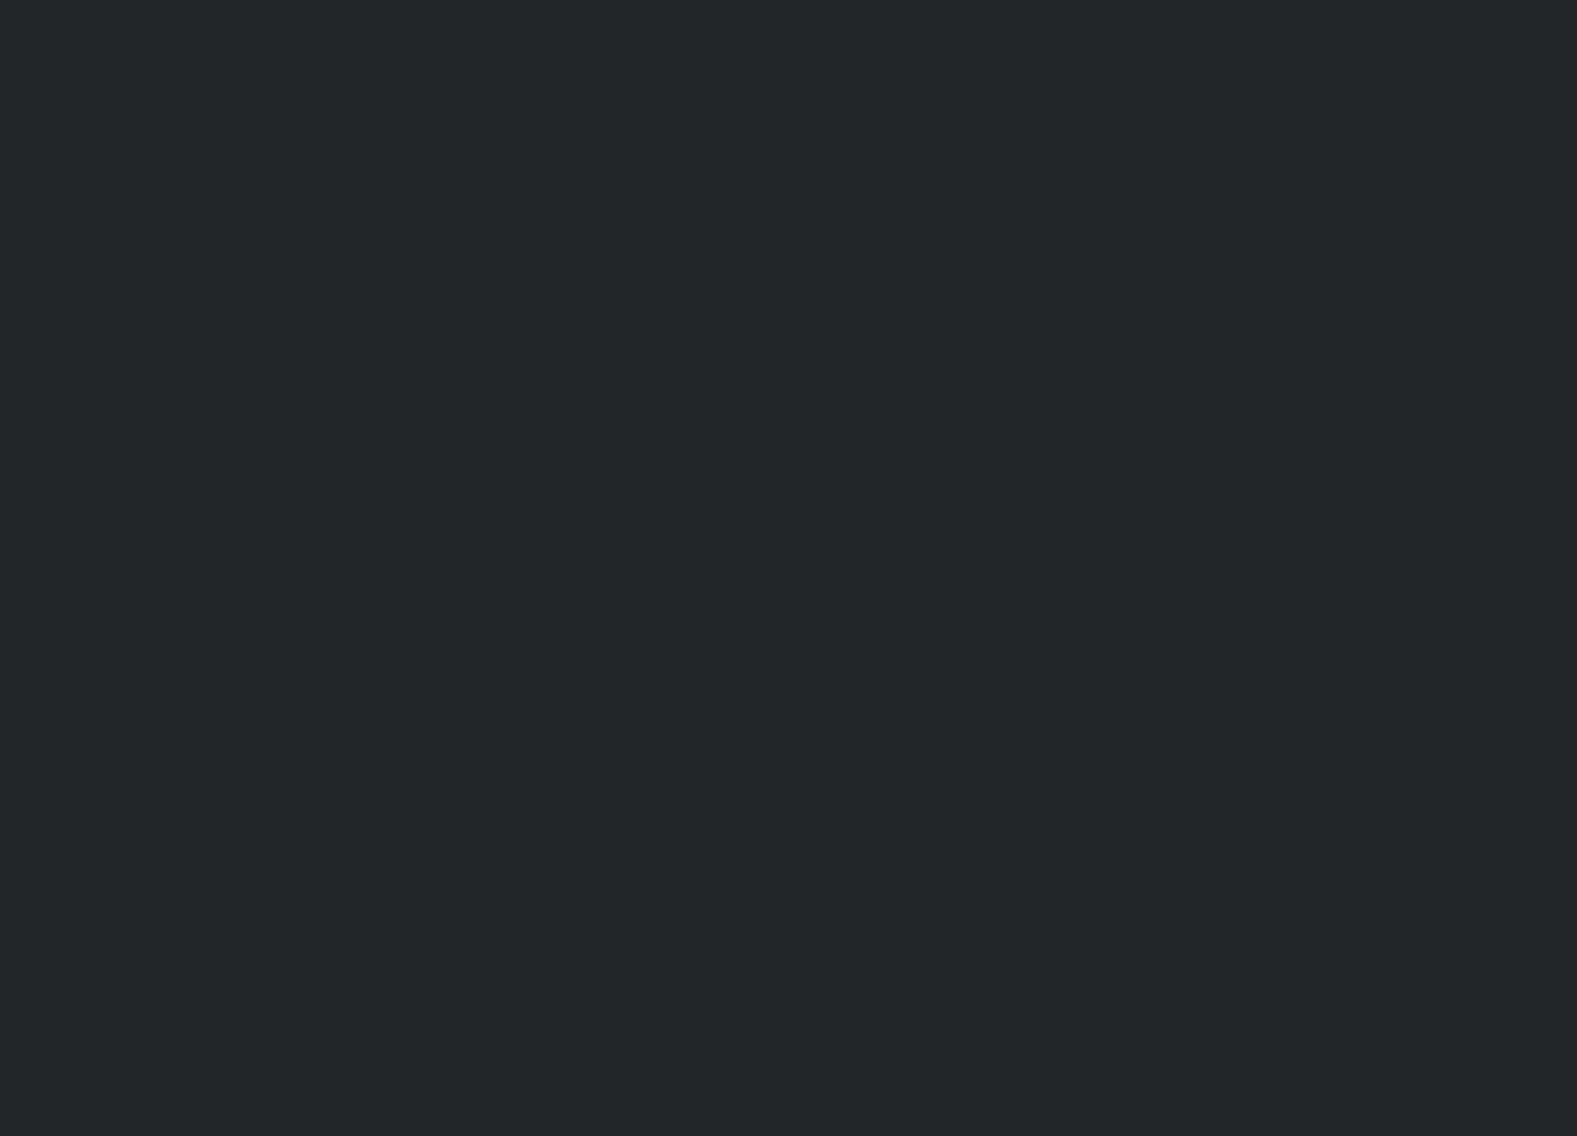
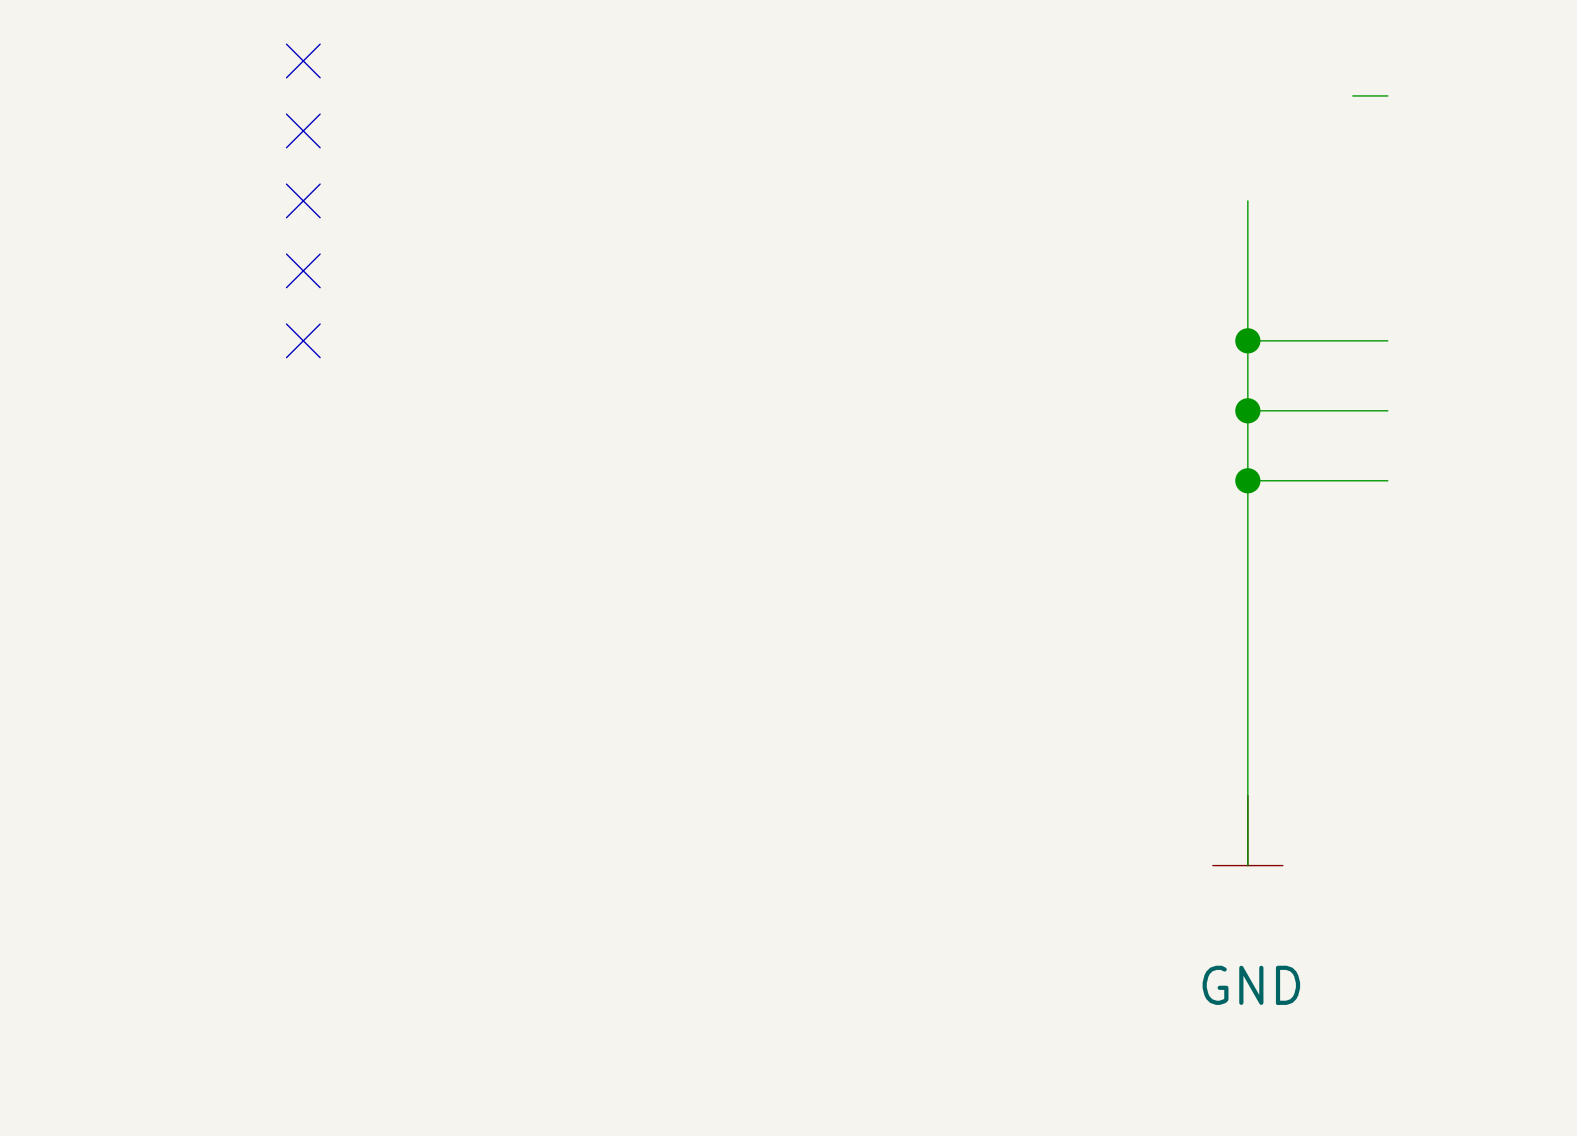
no-connect mark: none -> (303, 60)
wire: none -> (1352, 95) (1387, 95)
no-connect mark: none -> (303, 130)
no-connect mark: none -> (303, 200)
wire: none -> (1247, 200) (1247, 865)
no-connect mark: none -> (303, 270)
no-connect mark: none -> (303, 340)
wire: none -> (1247, 340) (1387, 340)
junction: none -> (1247, 340)
wire: none -> (1247, 410) (1387, 410)
junction: none -> (1247, 410)
wire: none -> (1247, 480) (1387, 480)
junction: none -> (1247, 480)
power symbol: none -> GND (1247, 830)

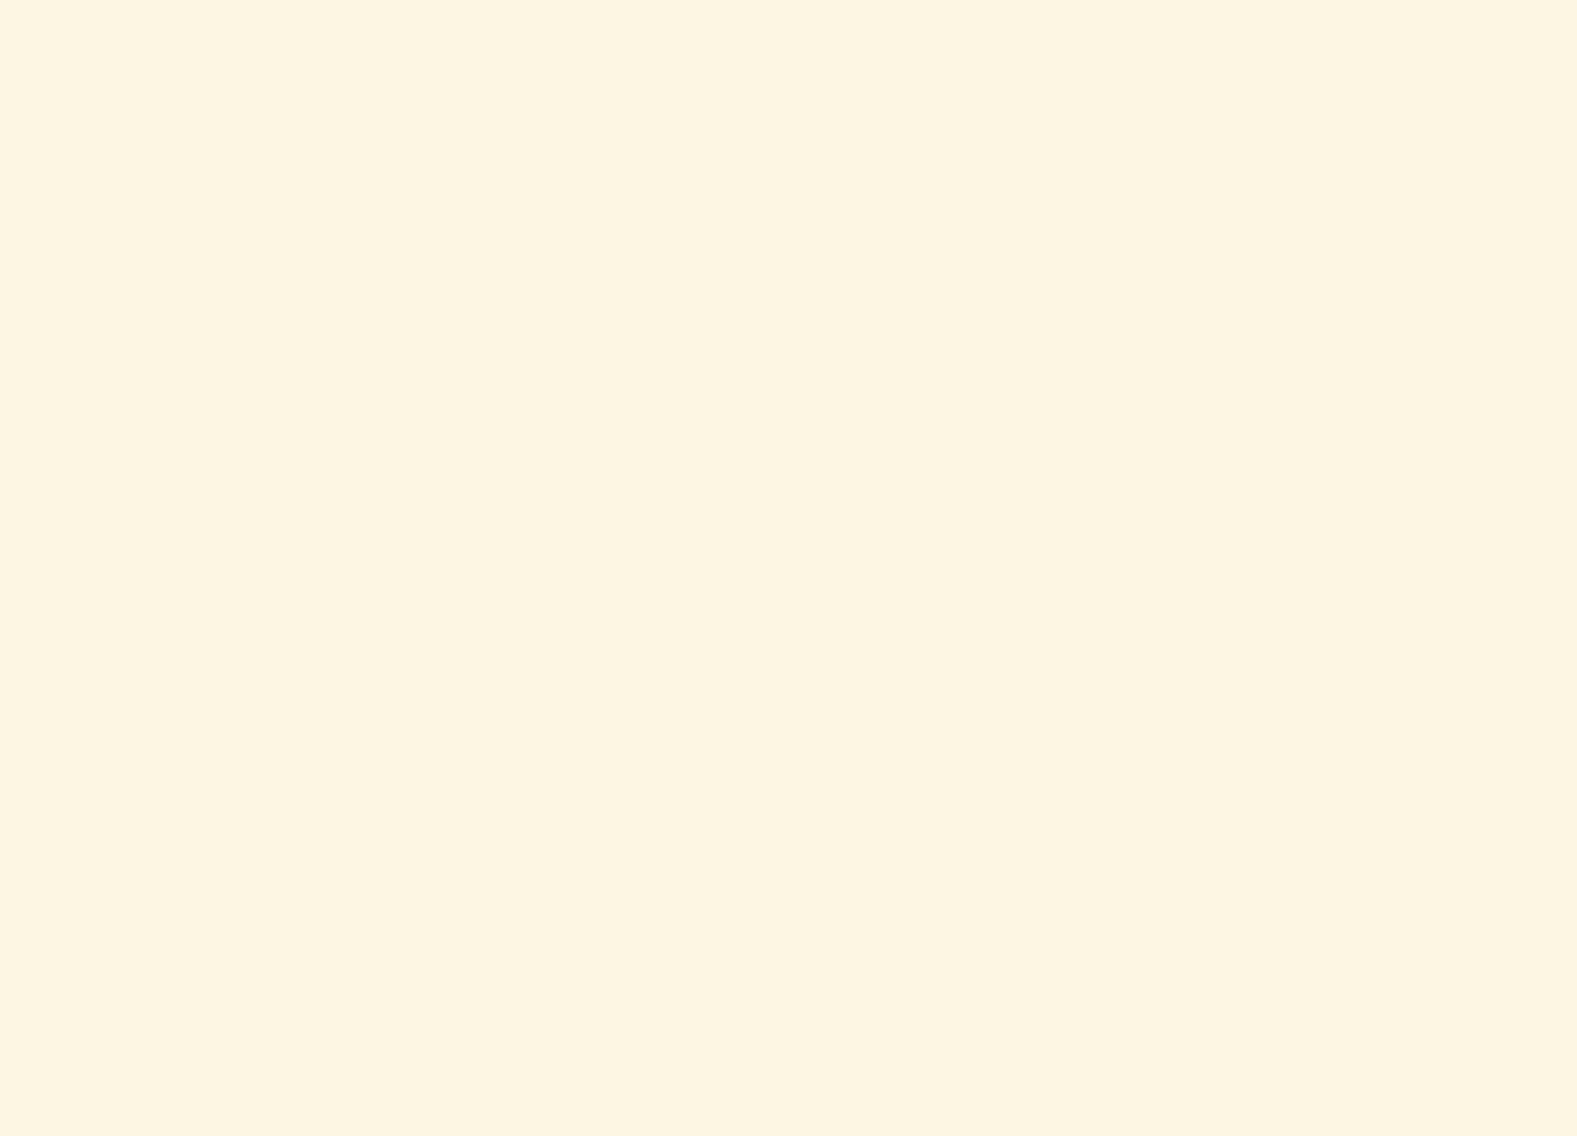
no-connect mark: (303, 60) -> none
wire: (1352, 95) (1387, 95) -> none
no-connect mark: (303, 130) -> none
no-connect mark: (303, 200) -> none
wire: (1247, 200) (1247, 865) -> none
no-connect mark: (303, 270) -> none
no-connect mark: (303, 340) -> none
wire: (1247, 340) (1387, 340) -> none
junction: (1247, 340) -> none
wire: (1247, 410) (1387, 410) -> none
junction: (1247, 410) -> none
wire: (1247, 480) (1387, 480) -> none
junction: (1247, 480) -> none
power symbol: GND (1247, 830) -> none

